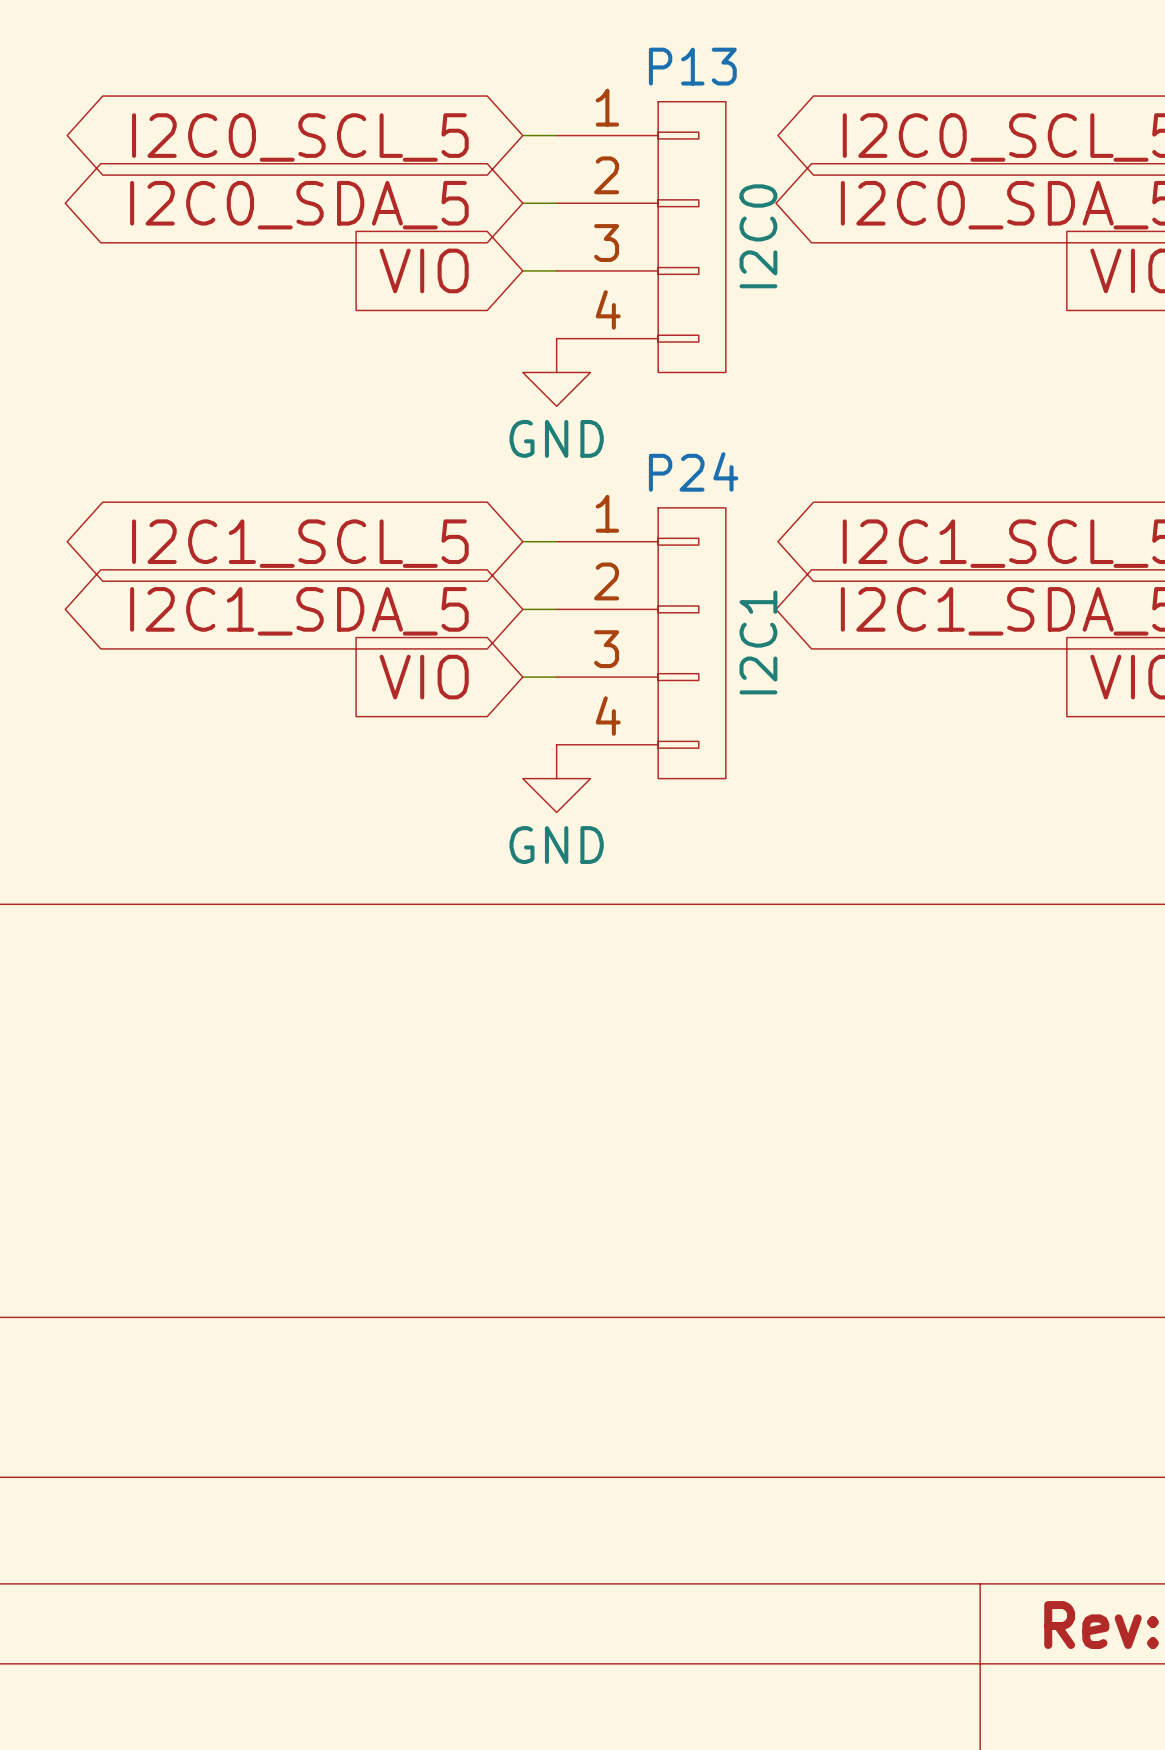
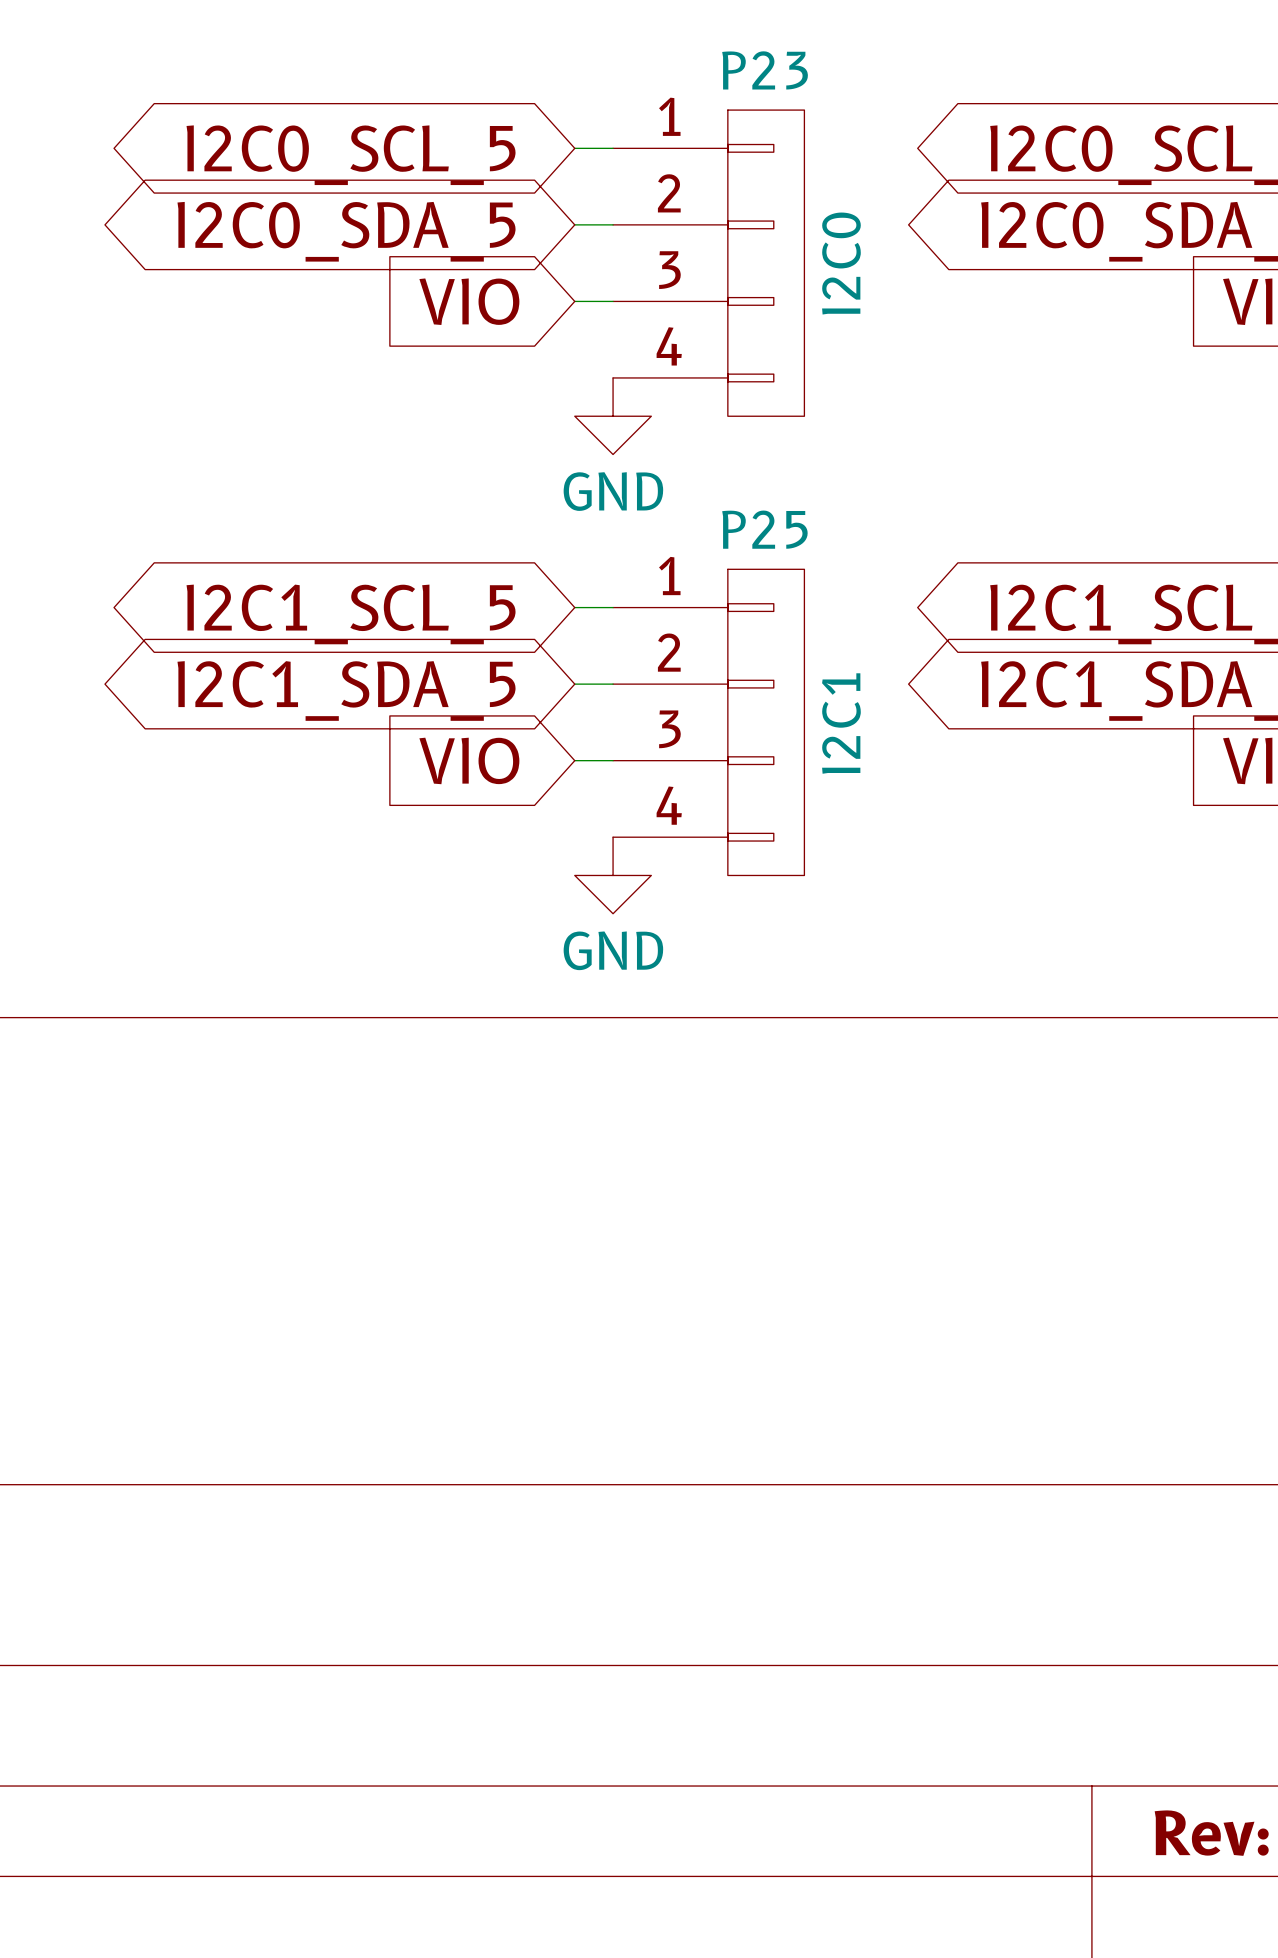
P13 name: P13 (692, 66) -> P23 (765, 70)
P24 name: P24 (693, 471) -> P25 (764, 529)

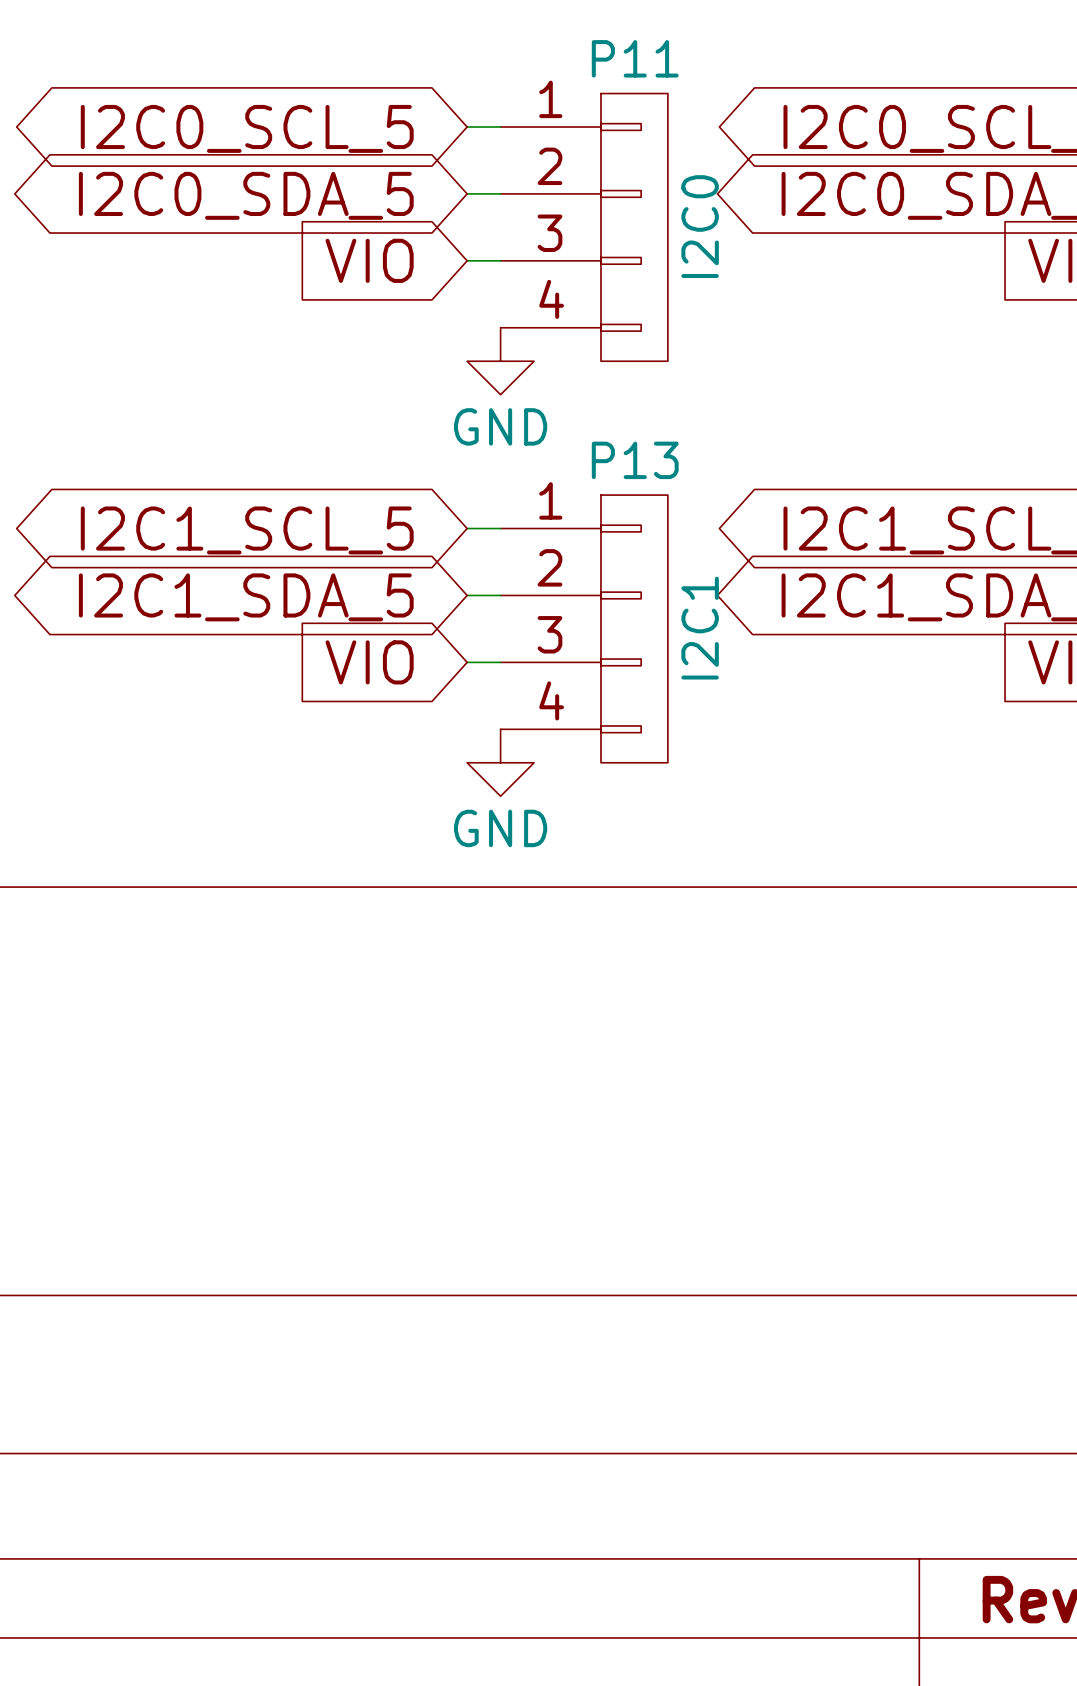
P23 name: P23 (765, 70) -> P11 (635, 58)
P25 name: P25 (764, 529) -> P13 (635, 460)

